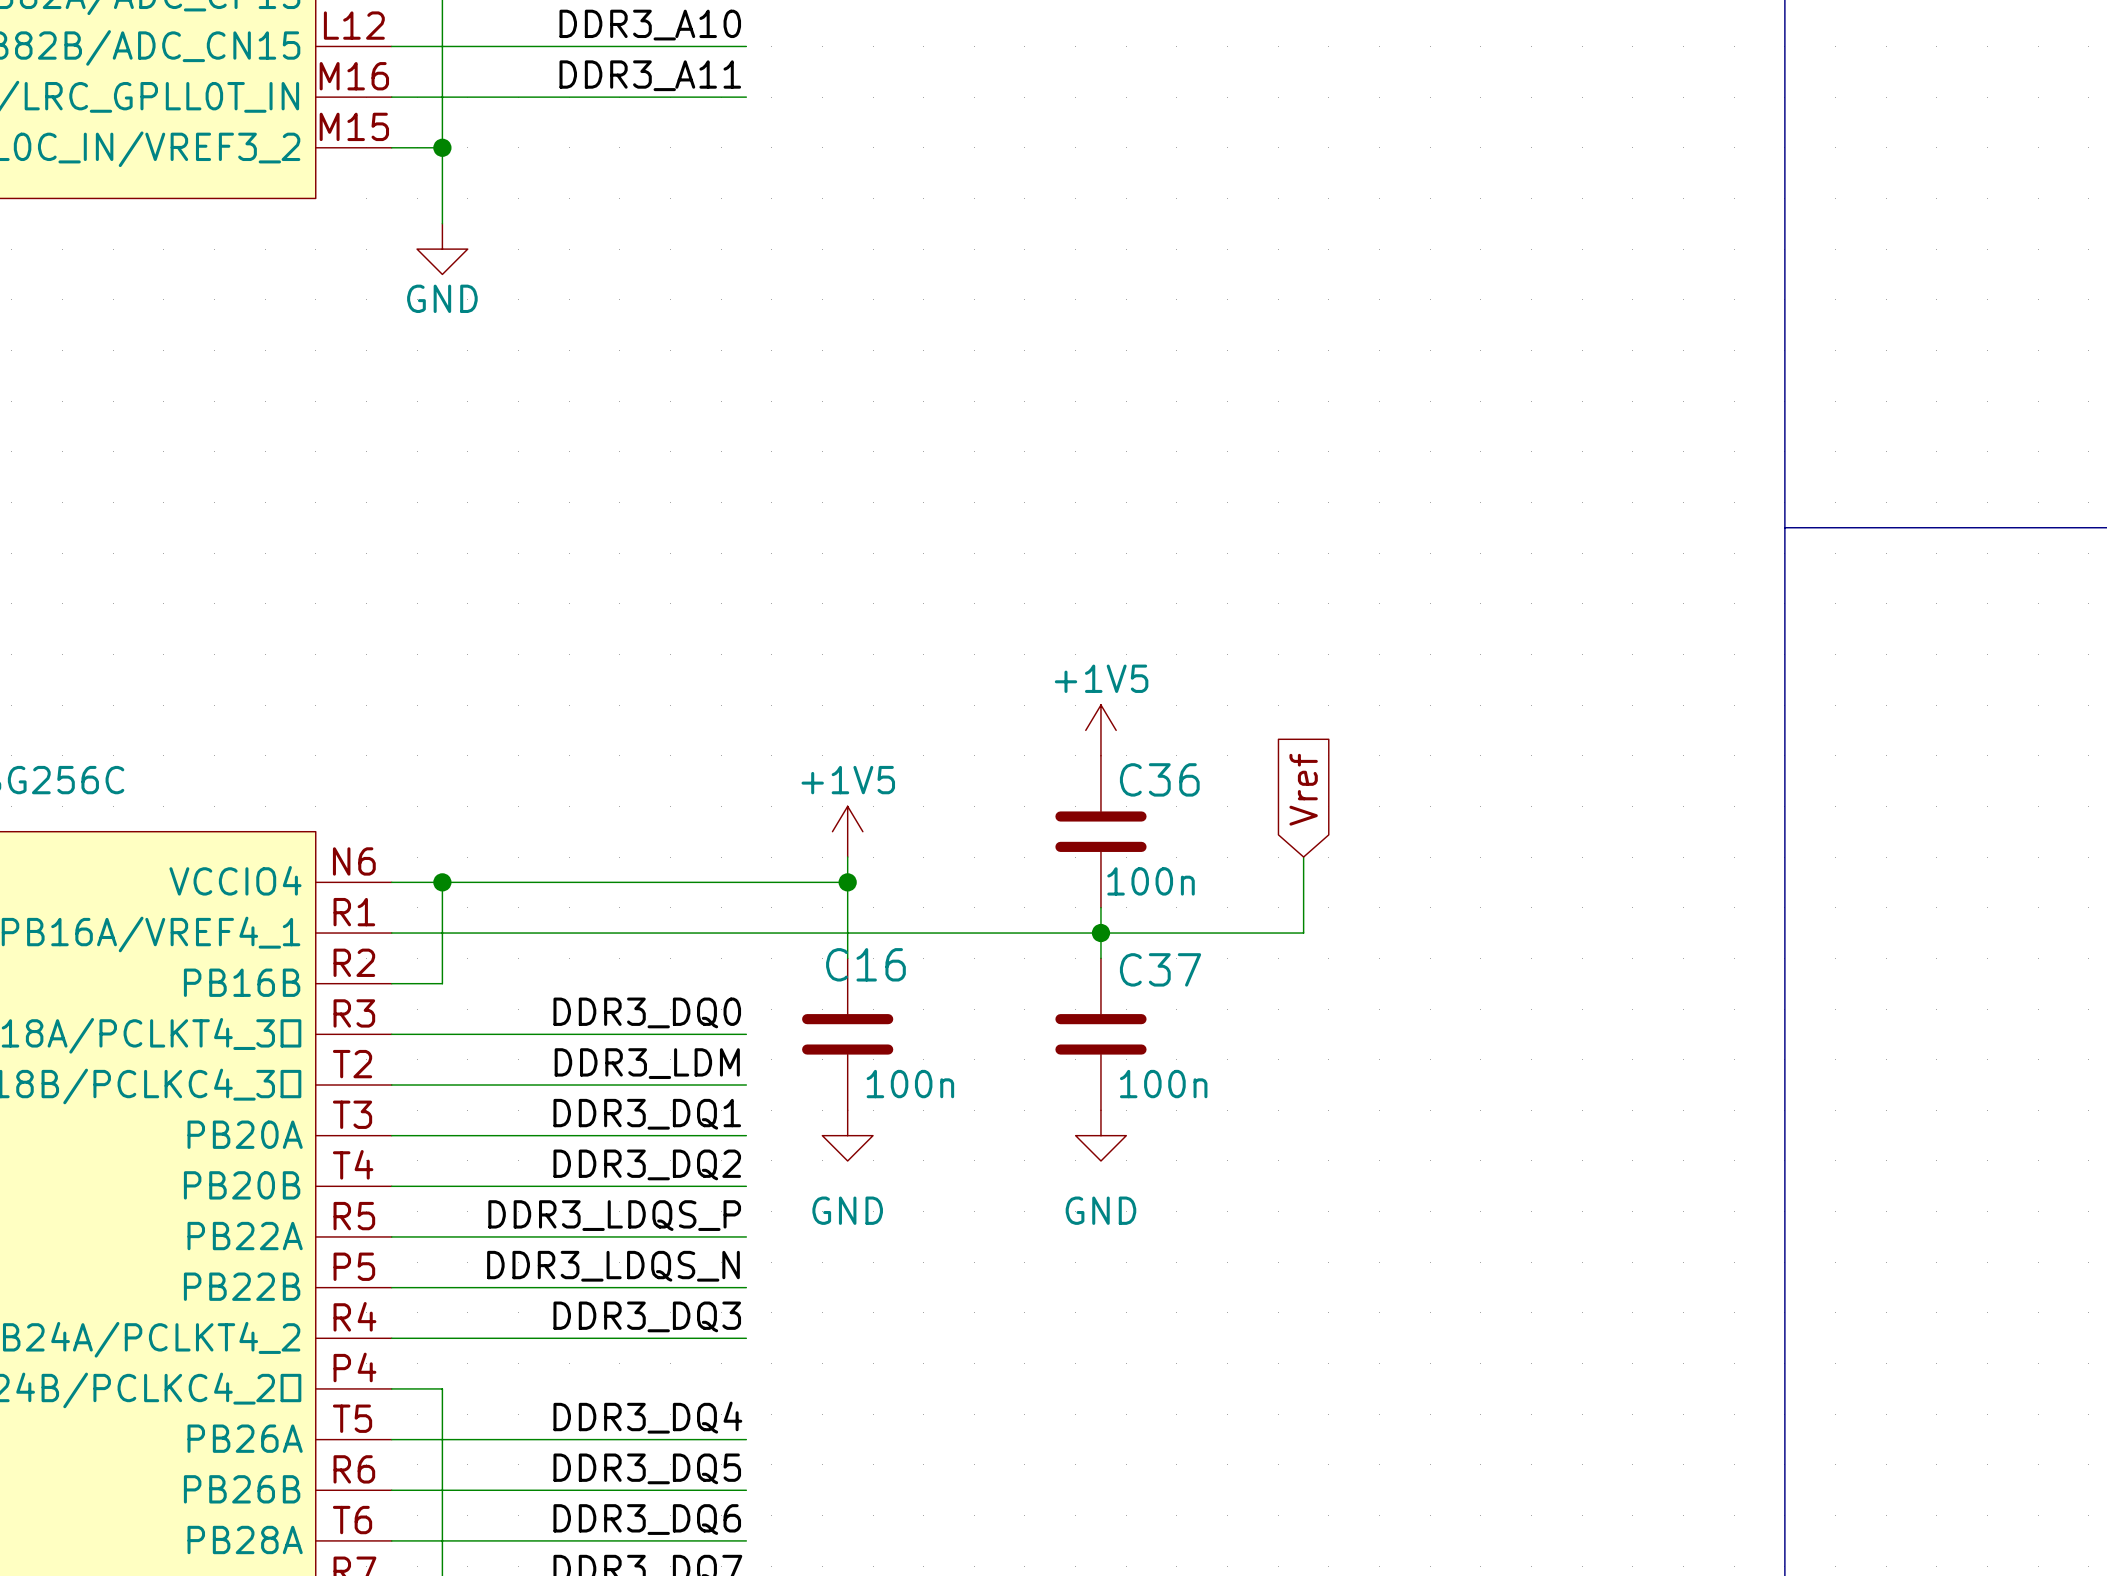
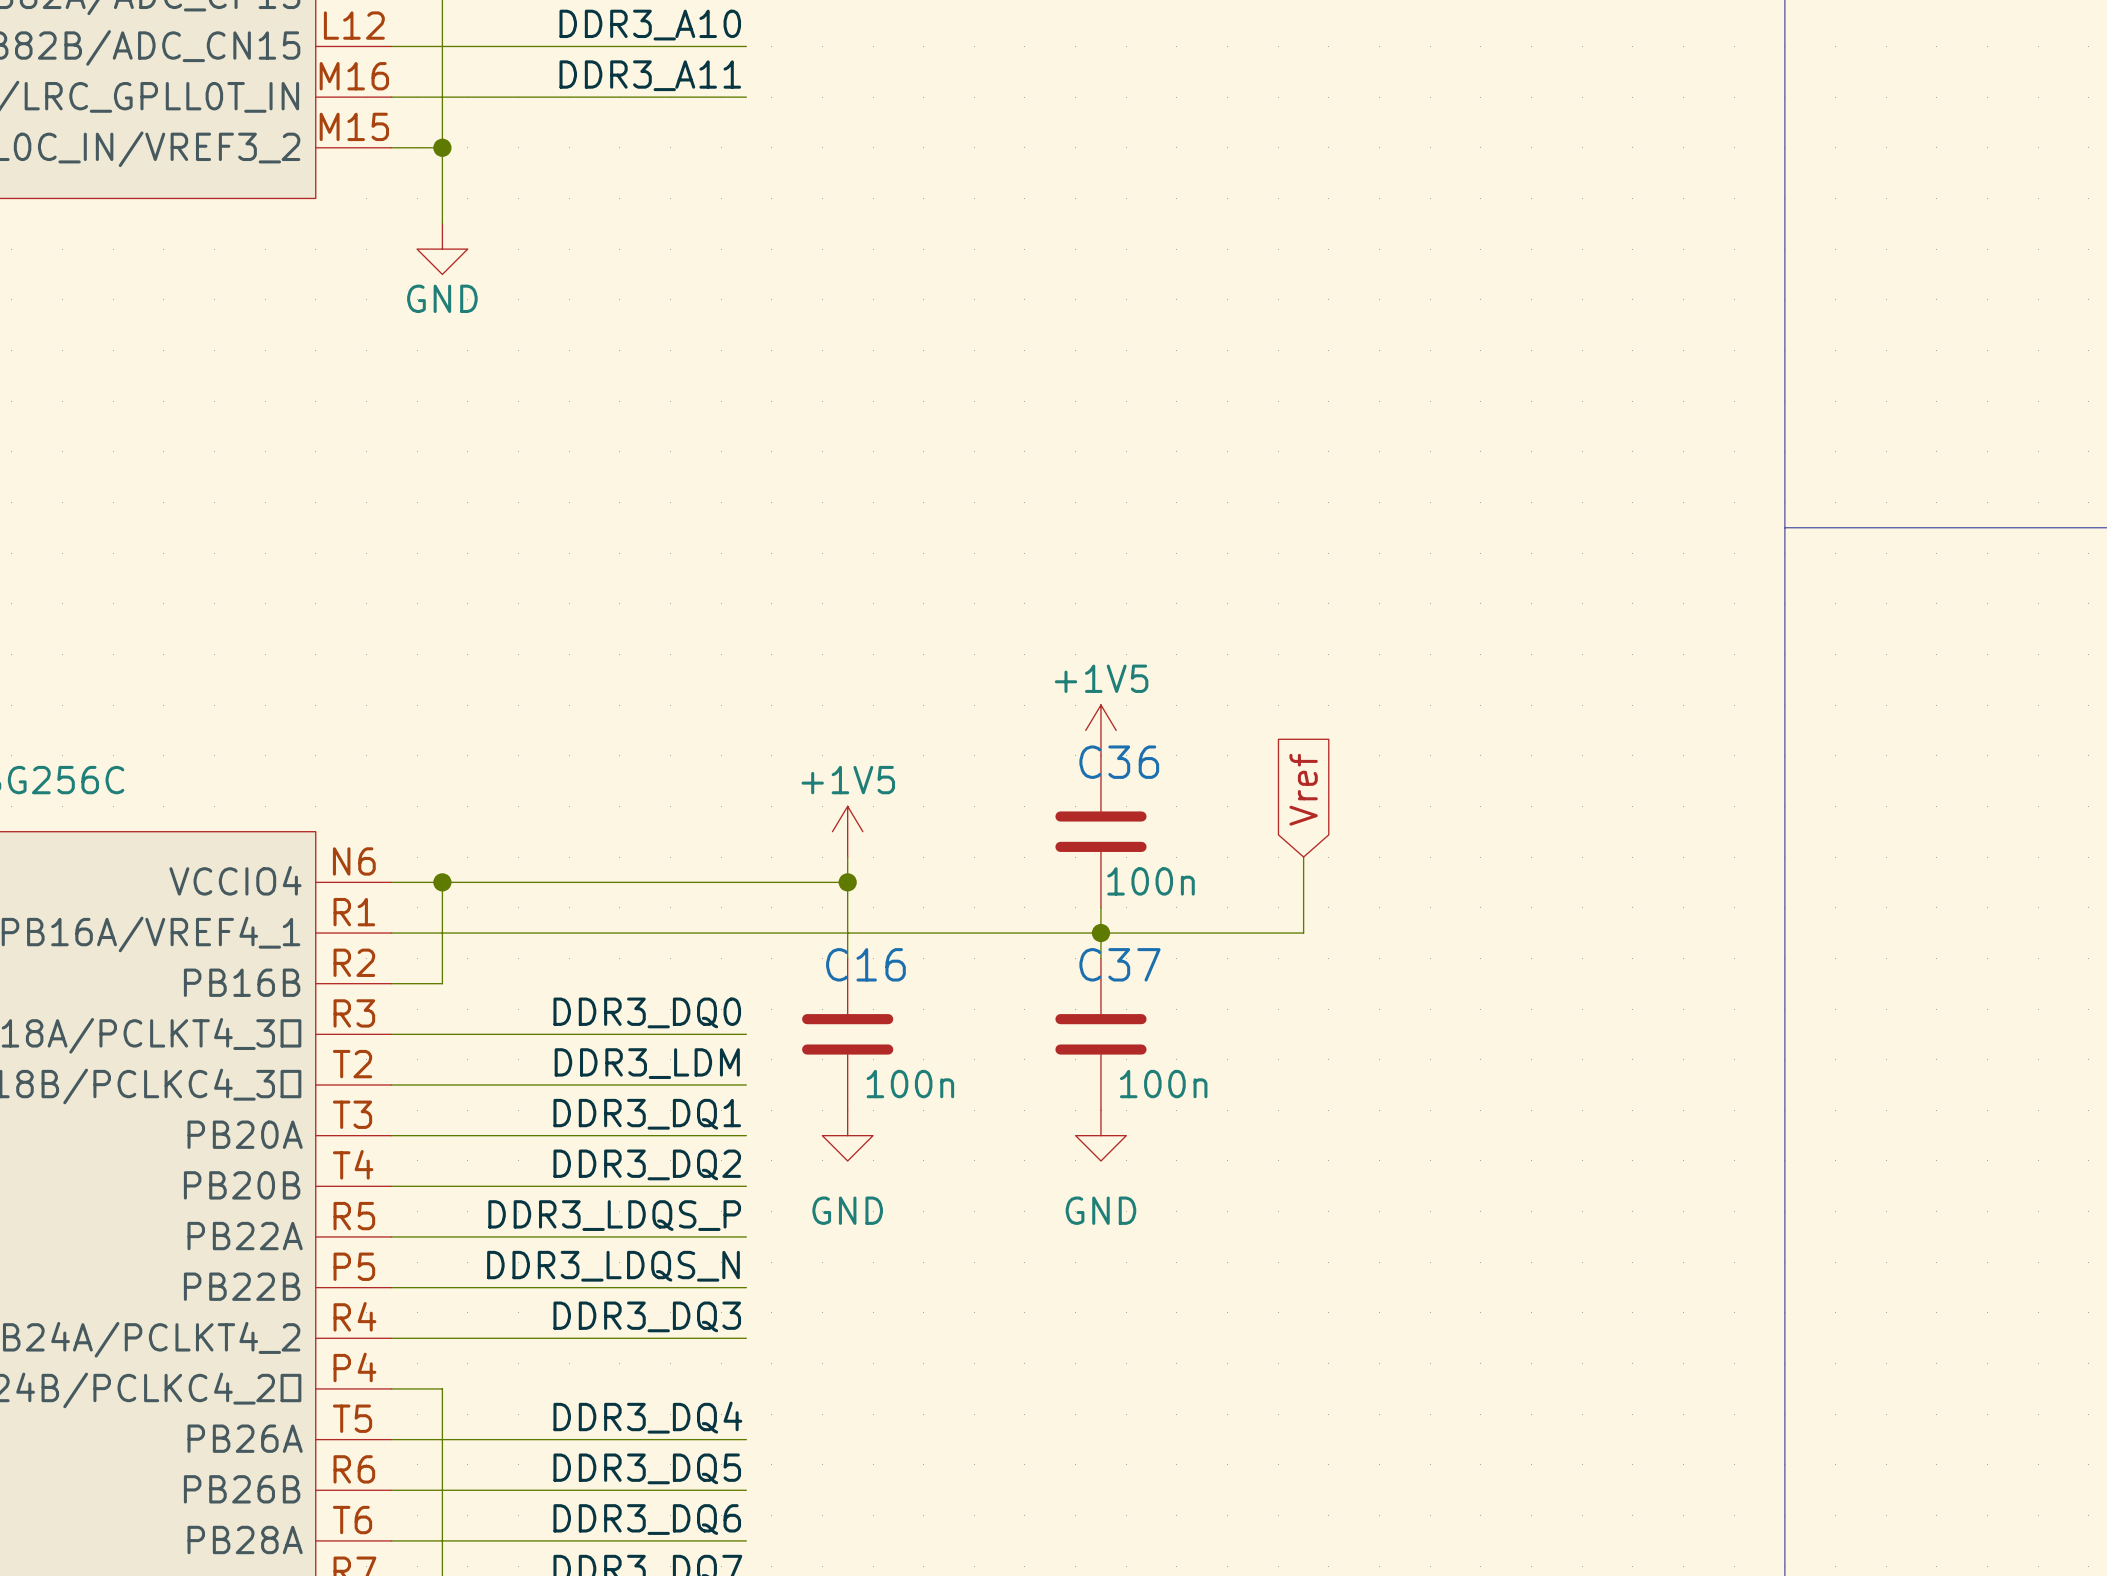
C36 name position: C36 (1159, 779) -> C36 (1119, 762)
C37 name position: C37 (1160, 969) -> C37 (1119, 964)

